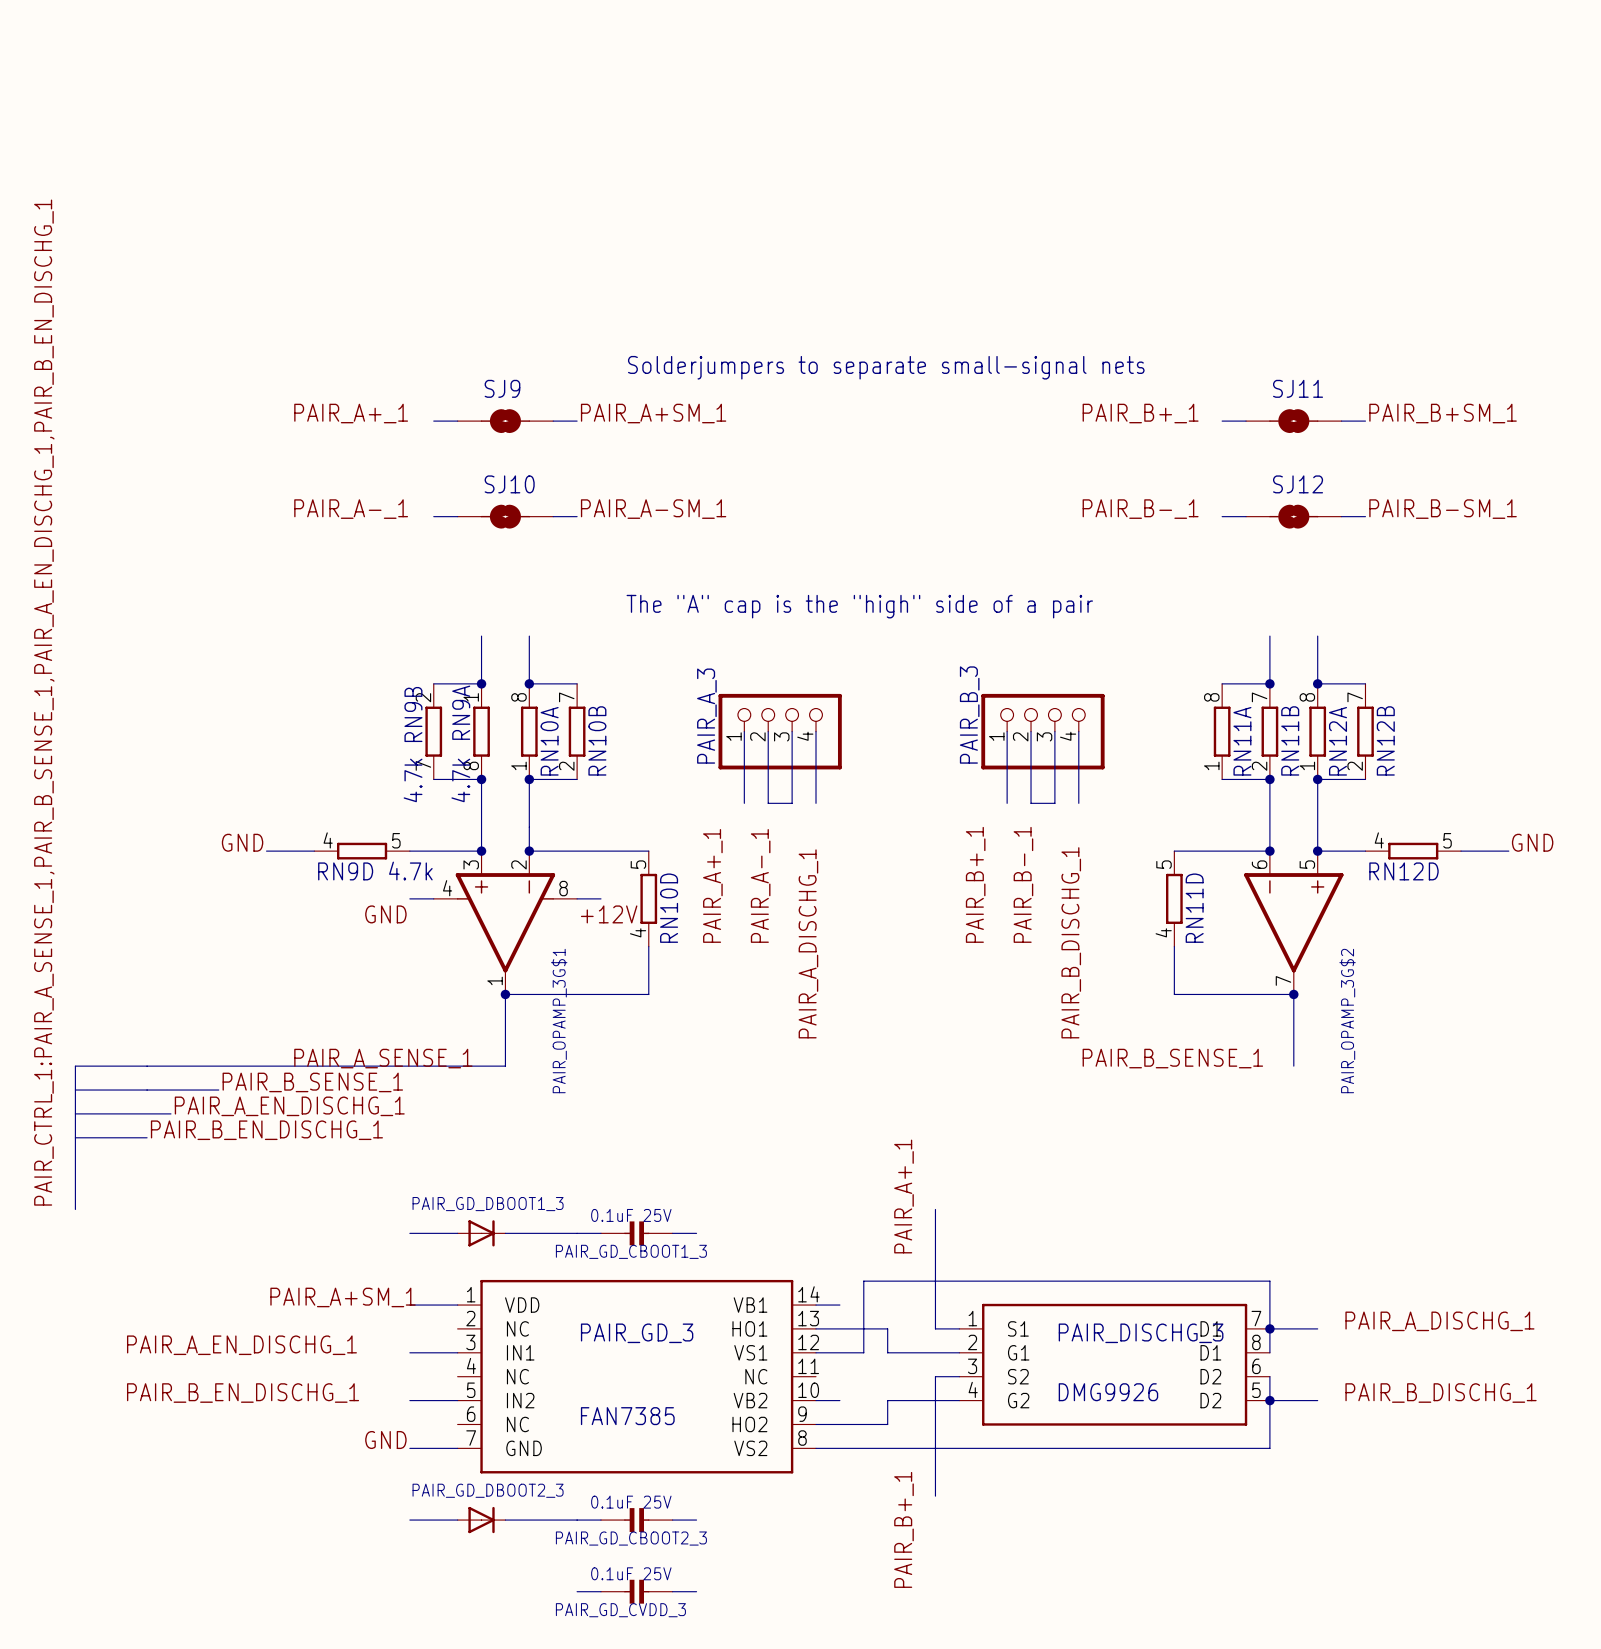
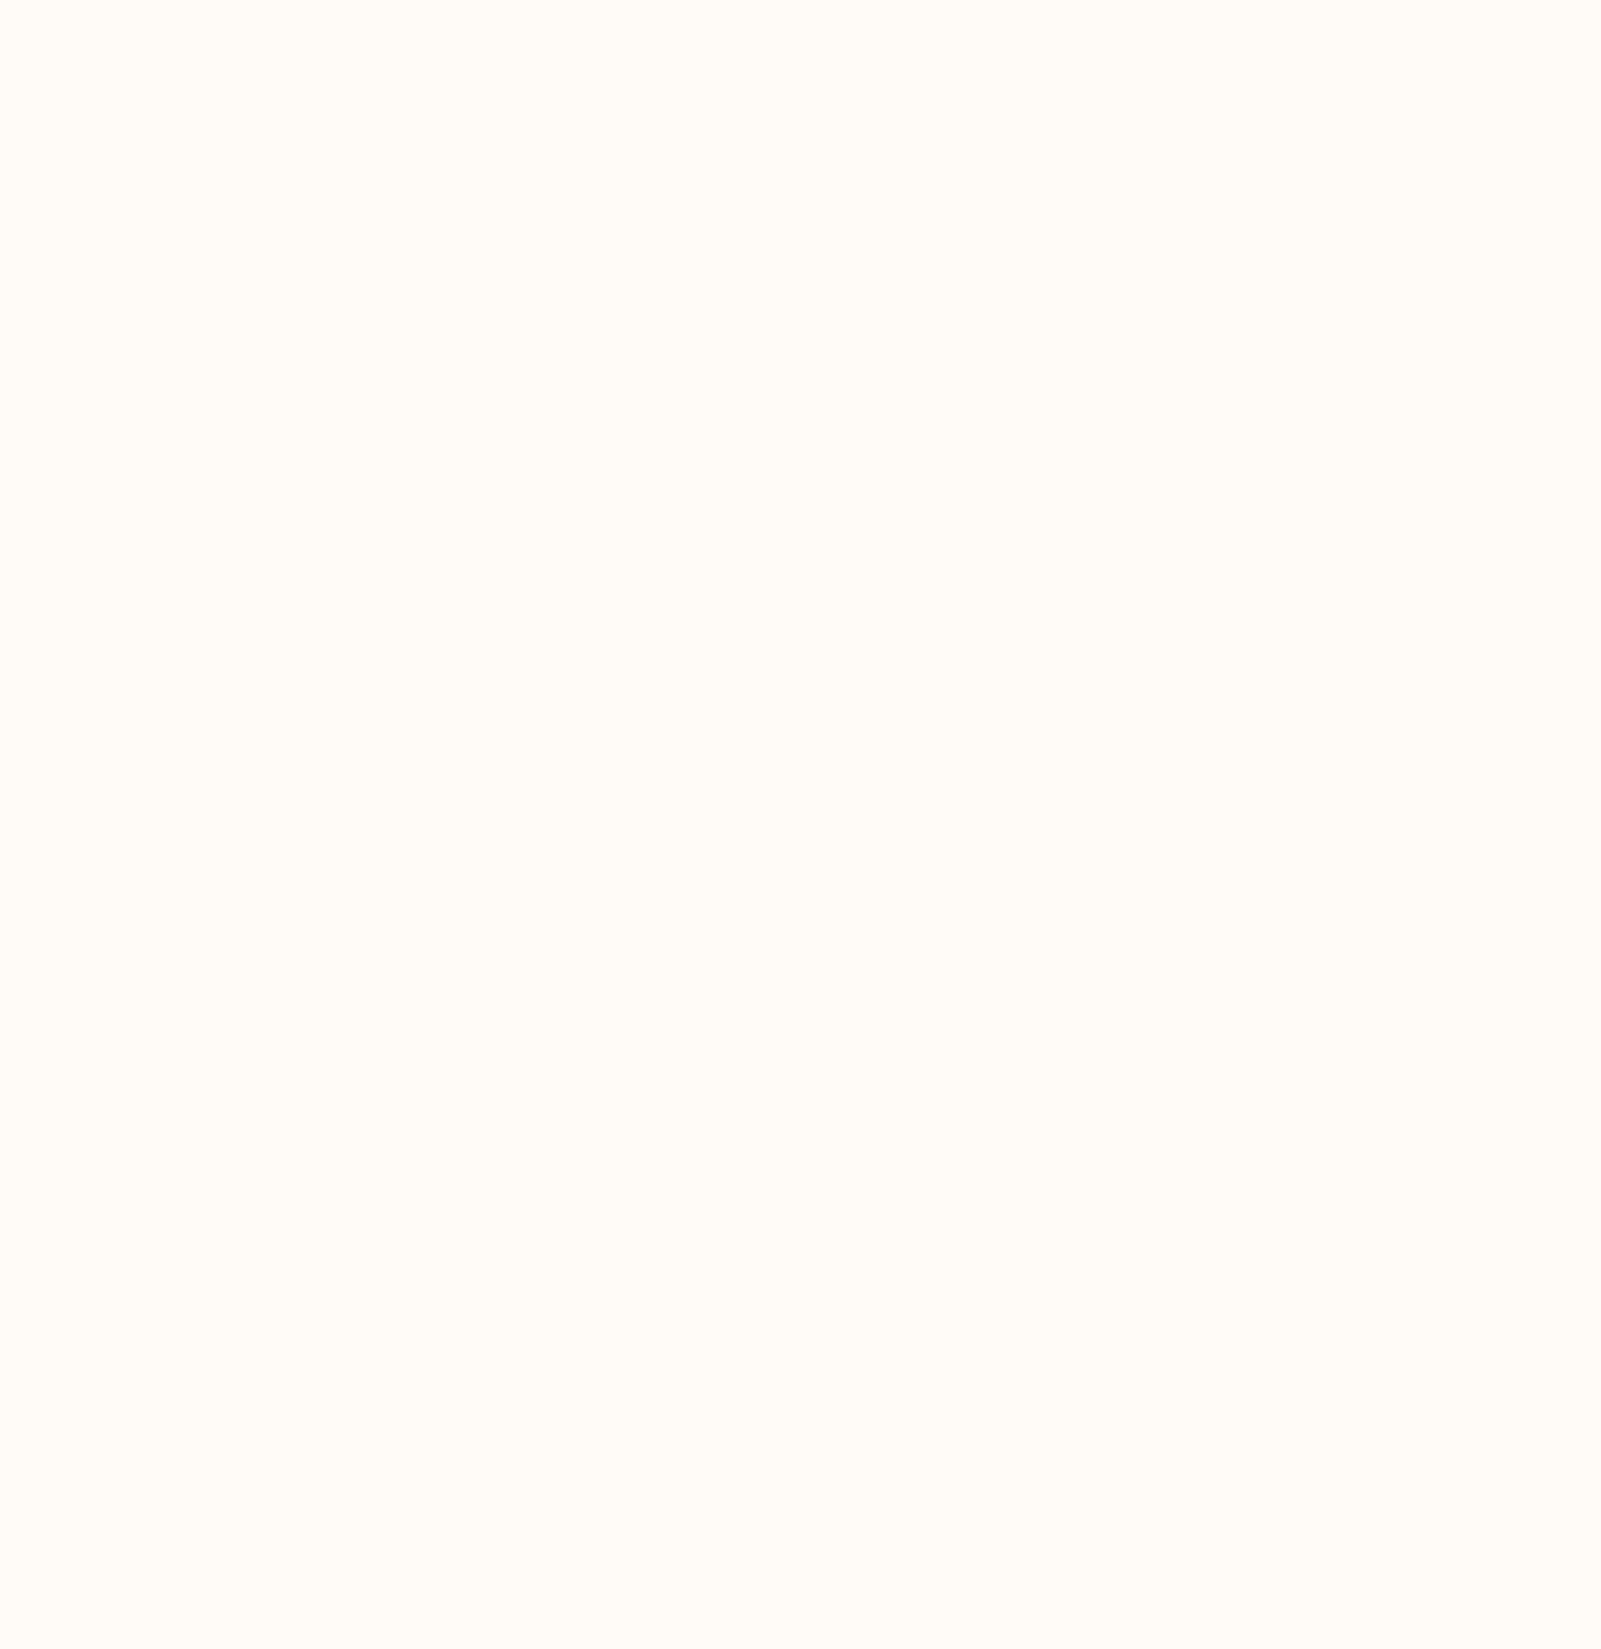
text: Solderjumpers to separate small-signal nets (886, 367) -> none
label: PAIR_A+_1 (351, 413) -> none
label: PAIR_A+SM_1 (653, 413) -> none
label: PAIR_B+_1 (1140, 413) -> none
label: PAIR_B+SM_1 (1443, 413) -> none
wire: (433, 421) (457, 421) -> none
SJ9: (505, 421) -> none
wire: (553, 421) (577, 421) -> none
wire: (1222, 421) (1246, 421) -> none
SJ11: (1293, 421) -> none
wire: (1341, 421) (1365, 421) -> none
label: PAIR_A-_1 (351, 509) -> none
label: PAIR_A-SM_1 (653, 509) -> none
label: PAIR_B-_1 (1140, 509) -> none
label: PAIR_B-SM_1 (1443, 509) -> none
wire: (433, 516) (457, 516) -> none
SJ10: (505, 516) -> none
wire: (553, 516) (577, 516) -> none
wire: (1222, 516) (1246, 516) -> none
SJ12: (1293, 516) -> none
wire: (1341, 516) (1365, 516) -> none
text: The "A" cap is the "high" side of a pair (859, 606) -> none
wire: (481, 636) (481, 683) (433, 683) -> none
wire: (529, 636) (529, 683) (577, 683) -> none
wire: (1269, 636) (1269, 683) (1222, 683) -> none
wire: (1317, 636) (1317, 683) (1365, 683) -> none
junction: (481, 683) -> none
junction: (529, 683) -> none
junction: (1269, 683) -> none
junction: (1317, 683) -> none
label: PAIR_CTRL_1:PAIR_A_SENSE_1,PAIR_B_SENSE_1,PAIR_A_EN_DISCHG_1,PAIR_B_EN_DISCHG_1 (44, 702) -> none
RN9B: 4.7k (433, 731) -> none
RN9A: 4.7k (481, 731) -> none
RN10A: (529, 731) -> none
RN10B: (577, 731) -> none
wire: (744, 731) (744, 803) -> none
wire: (768, 731) (768, 803) (792, 803) (792, 731) -> none
PAIR_A_3: (780, 731) -> none
wire: (816, 731) (816, 803) -> none
wire: (1007, 731) (1007, 803) -> none
wire: (1031, 731) (1031, 803) (1054, 803) (1054, 731) -> none
PAIR_B_3: (1042, 731) -> none
wire: (1078, 731) (1078, 803) -> none
RN11A: (1222, 731) -> none
RN11B: (1269, 731) -> none
RN12A: (1317, 731) -> none
RN12B: (1365, 731) -> none
wire: (433, 779) (481, 779) (481, 851) (409, 851) -> none
junction: (481, 779) -> none
junction: (529, 779) -> none
wire: (577, 779) (529, 779) (529, 851) (648, 851) -> none
wire: (1222, 779) (1269, 779) (1269, 851) (1174, 851) -> none
junction: (1269, 779) -> none
junction: (1317, 779) -> none
wire: (1365, 779) (1317, 779) (1317, 851) (1365, 851) -> none
label: GND (242, 842) -> none
label: GND (1532, 842) -> none
wire: (266, 851) (314, 851) -> none
RN9D: 4.7k (362, 851) -> none
junction: (481, 851) -> none
junction: (529, 851) -> none
junction: (1269, 851) -> none
junction: (1317, 851) -> none
RN12D: (1413, 851) -> none
wire: (1461, 851) (1508, 851) -> none
label: PAIR_B+_1 (975, 884) -> none
label: PAIR_B-_1 (1023, 884) -> none
label: PAIR_A+_1 (712, 885) -> none
label: PAIR_A-_1 (760, 885) -> none
wire: (409, 898) (433, 898) -> none
wire: (577, 898) (600, 898) -> none
RN10D: (648, 898) -> none
RN11D: (1174, 898) -> none
label: GND (385, 914) -> none
label: +12V (609, 914) -> none
PAIR_OPAMP_3G$1: (505, 922) -> none
PAIR_OPAMP_3G$2: (1293, 922) -> none
label: PAIR_B_DISCHG_1 (1071, 942) -> none
label: PAIR_A_DISCHG_1 (808, 943) -> none
wire: (648, 946) (648, 994) (505, 994) (505, 1066) (75, 1066) -> none
wire: (1174, 946) (1174, 994) (1293, 994) (1293, 1066) -> none
junction: (505, 994) -> none
junction: (1293, 994) -> none
label: PAIR_A_SENSE_1 (383, 1058) -> none
label: PAIR_B_SENSE_1 (1172, 1058) -> none
bus: (75, 1066) (75, 1209) -> none
label: PAIR_B_SENSE_1 (312, 1082) -> none
wire: (75, 1090) (218, 1090) -> none
label: PAIR_A_EN_DISCHG_1 (289, 1106) -> none
wire: (75, 1113) (170, 1113) -> none
label: PAIR_B_EN_DISCHG_1 (266, 1130) -> none
wire: (75, 1137) (147, 1137) -> none
label: PAIR_A+_1 (904, 1196) -> none
wire: (935, 1209) (935, 1328) (959, 1328) -> none
wire: (409, 1233) (457, 1233) -> none
PAIR_GD_DBOOT1_3: (481, 1233) -> none
wire: (505, 1233) (600, 1233) -> none
PAIR_GD_CBOOT1_3: 0.1uF 25V (636, 1233) -> none
wire: (672, 1233) (696, 1233) -> none
label: PAIR_A+SM_1 (343, 1297) -> none
wire: (409, 1305) (457, 1305) -> none
wire: (816, 1305) (839, 1305) -> none
label: PAIR_A_DISCHG_1 (1439, 1321) -> none
wire: (816, 1328) (887, 1328) (887, 1352) (959, 1352) -> none
wire: (1269, 1328) (1317, 1328) -> none
junction: (1269, 1328) -> none
label: PAIR_A_EN_DISCHG_1 (241, 1345) -> none
wire: (409, 1352) (457, 1352) -> none
wire: (816, 1352) (863, 1352) (863, 1281) (1269, 1281) (1269, 1352) -> none
PAIR_DISCHG_3: (1114, 1364) -> none
PAIR_GD_3: (636, 1376) -> none
wire: (959, 1376) (935, 1376) (935, 1496) -> none
wire: (1269, 1376) (1269, 1448) (816, 1448) -> none
label: PAIR_B_EN_DISCHG_1 (243, 1393) -> none
label: PAIR_B_DISCHG_1 (1441, 1393) -> none
wire: (409, 1400) (457, 1400) -> none
wire: (816, 1400) (839, 1400) -> none
wire: (959, 1400) (887, 1400) (887, 1424) (816, 1424) -> none
wire: (1269, 1400) (1317, 1400) -> none
junction: (1269, 1400) -> none
label: GND (385, 1440) -> none
wire: (409, 1448) (457, 1448) -> none
wire: (409, 1520) (457, 1520) -> none
PAIR_GD_DBOOT2_3: (481, 1520) -> none
wire: (505, 1520) (600, 1520) -> none
PAIR_GD_CBOOT2_3: 0.1uF 25V (636, 1520) -> none
wire: (672, 1520) (696, 1520) -> none
label: PAIR_B+_1 (904, 1529) -> none
wire: (577, 1591) (600, 1591) -> none
PAIR_GD_CVDD_3: 0.1uF 25V (636, 1591) -> none
wire: (672, 1591) (696, 1591) -> none

